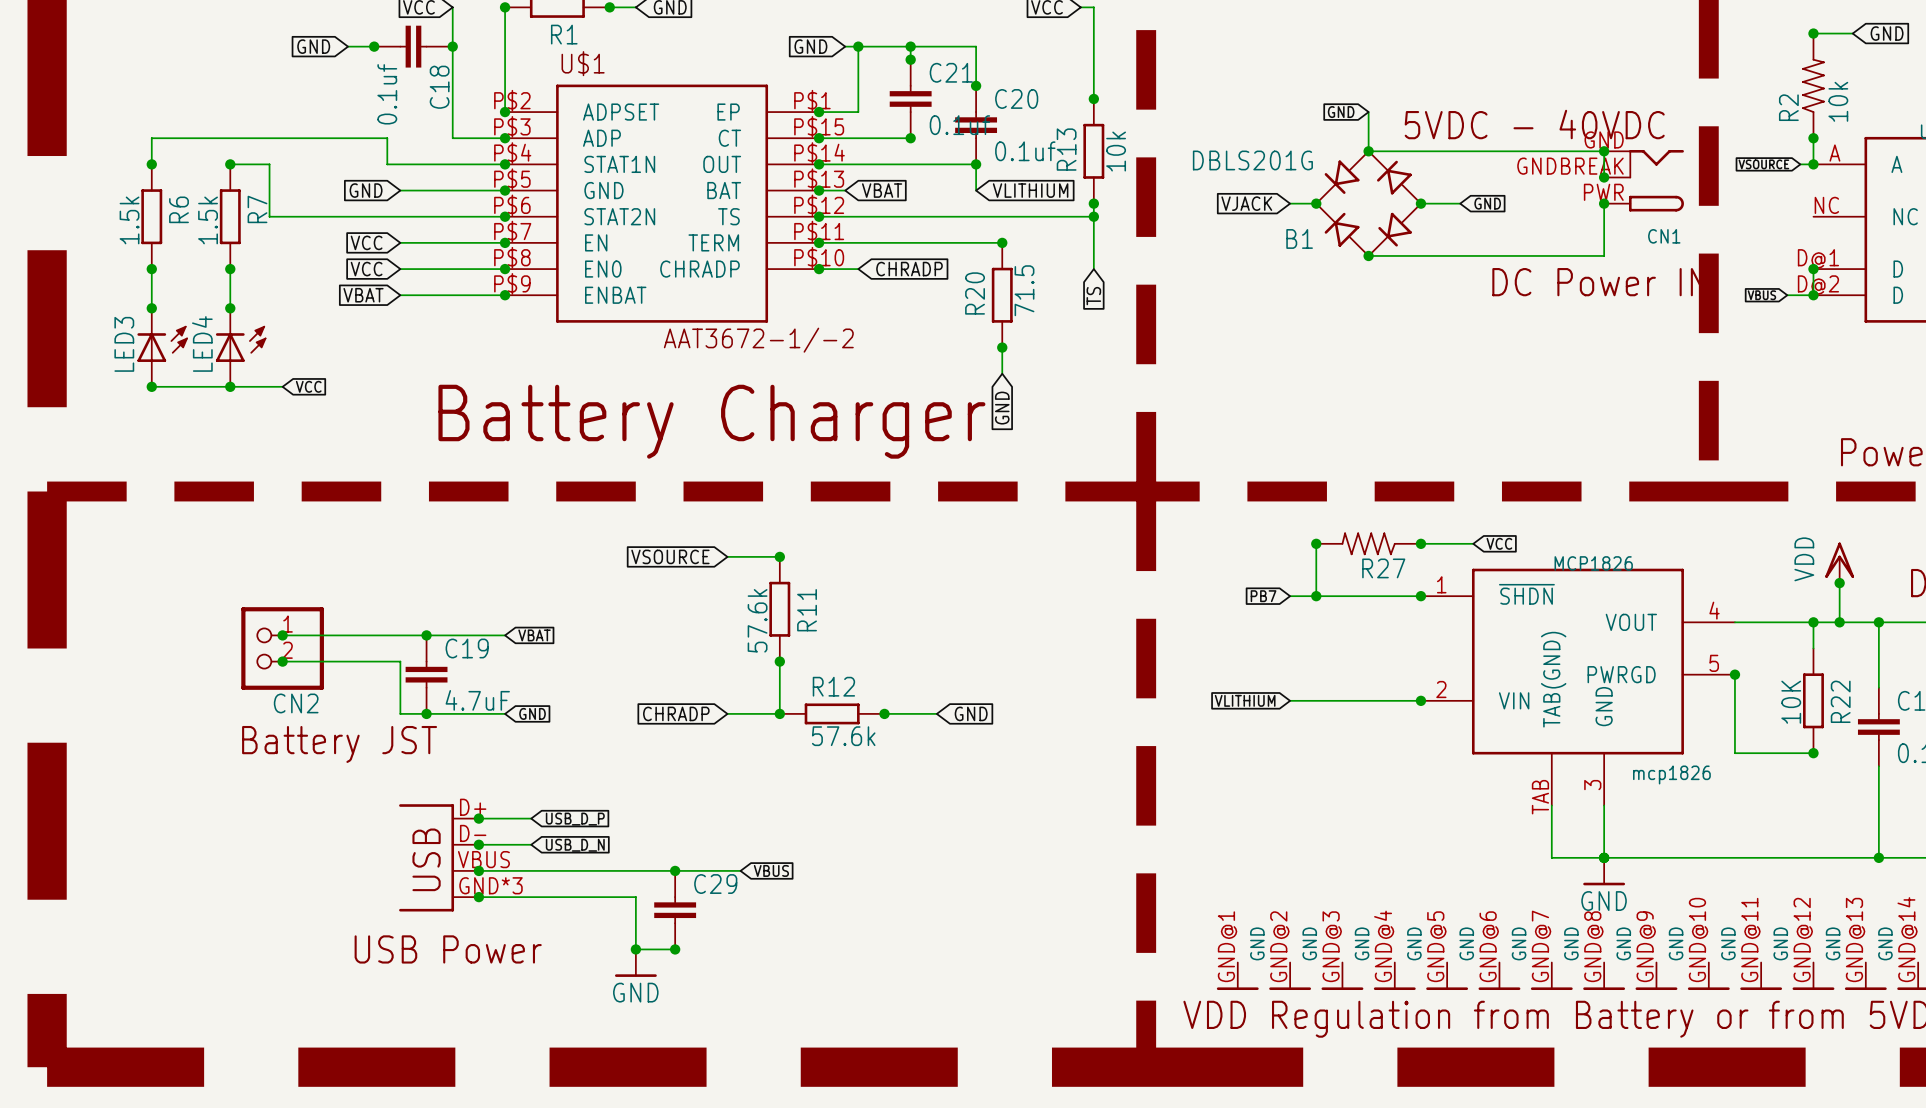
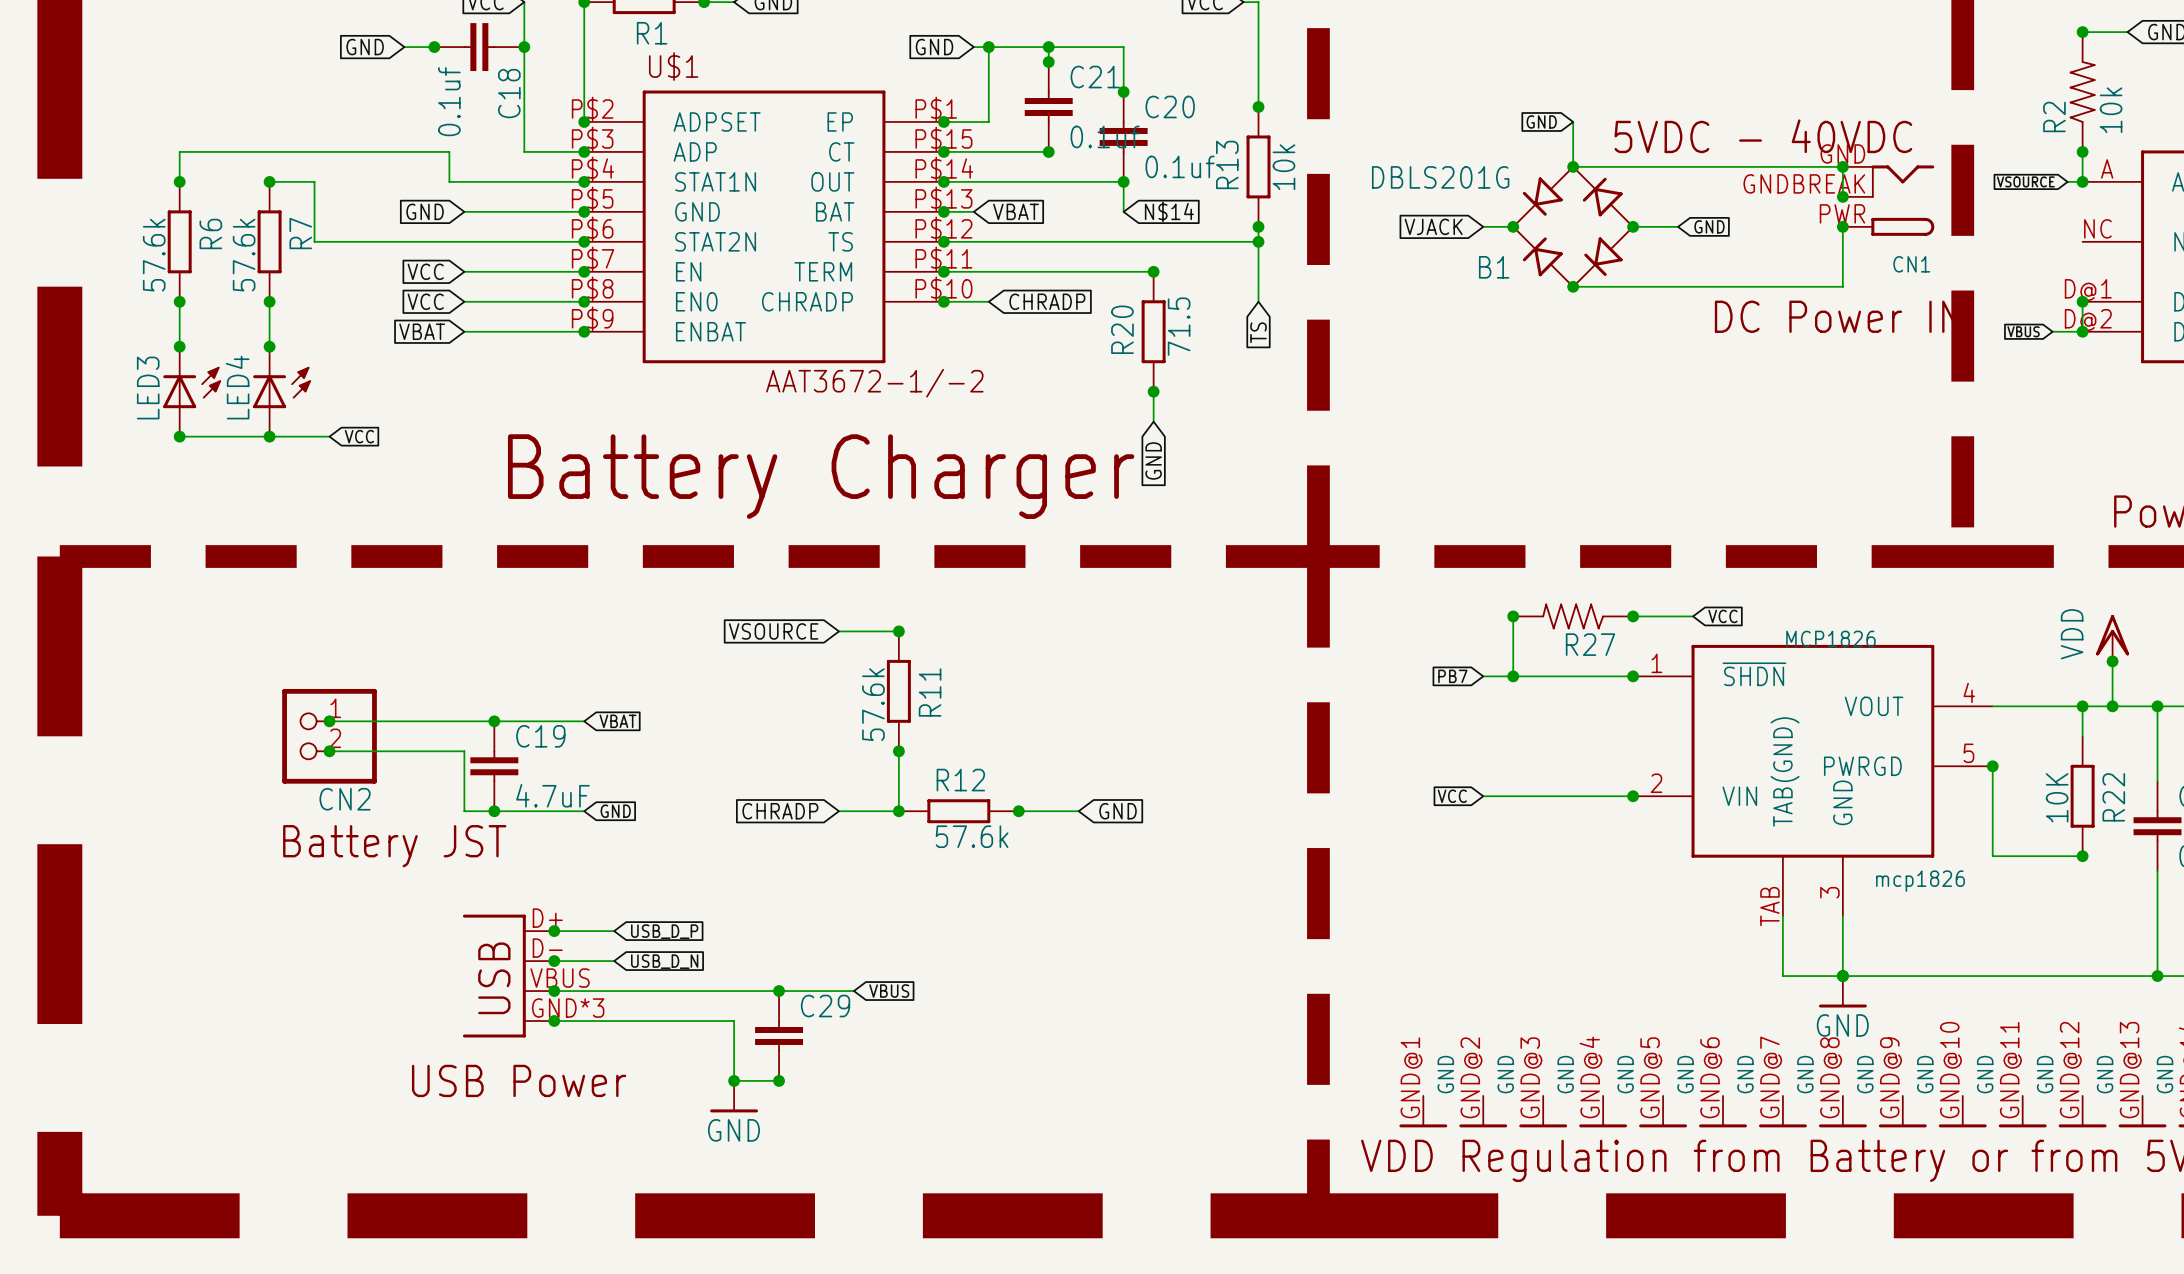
global label: VLITHIUM (1030, 190) -> N$14 (1169, 211)
R6 value: 1.5k (129, 220) -> 57.6k (154, 255)
R7 value: 1.5k (208, 220) -> 57.6k (244, 255)
global label: VLITHIUM (1245, 700) -> VCC (1452, 796)

